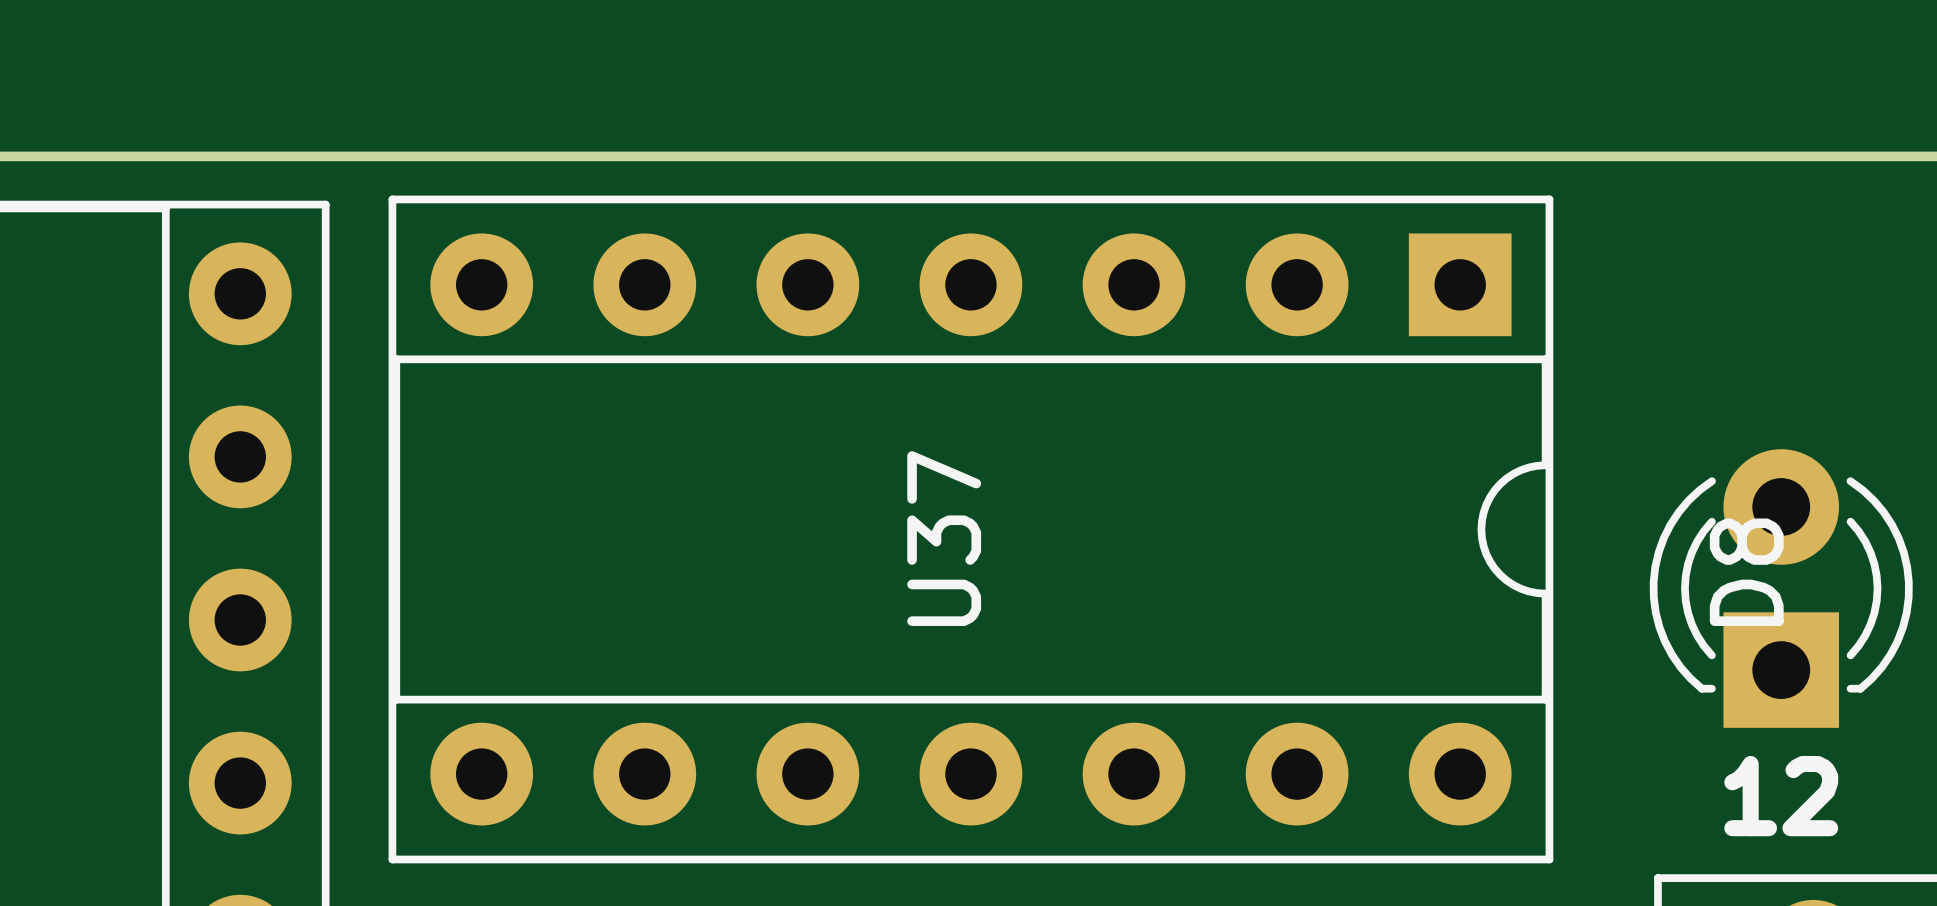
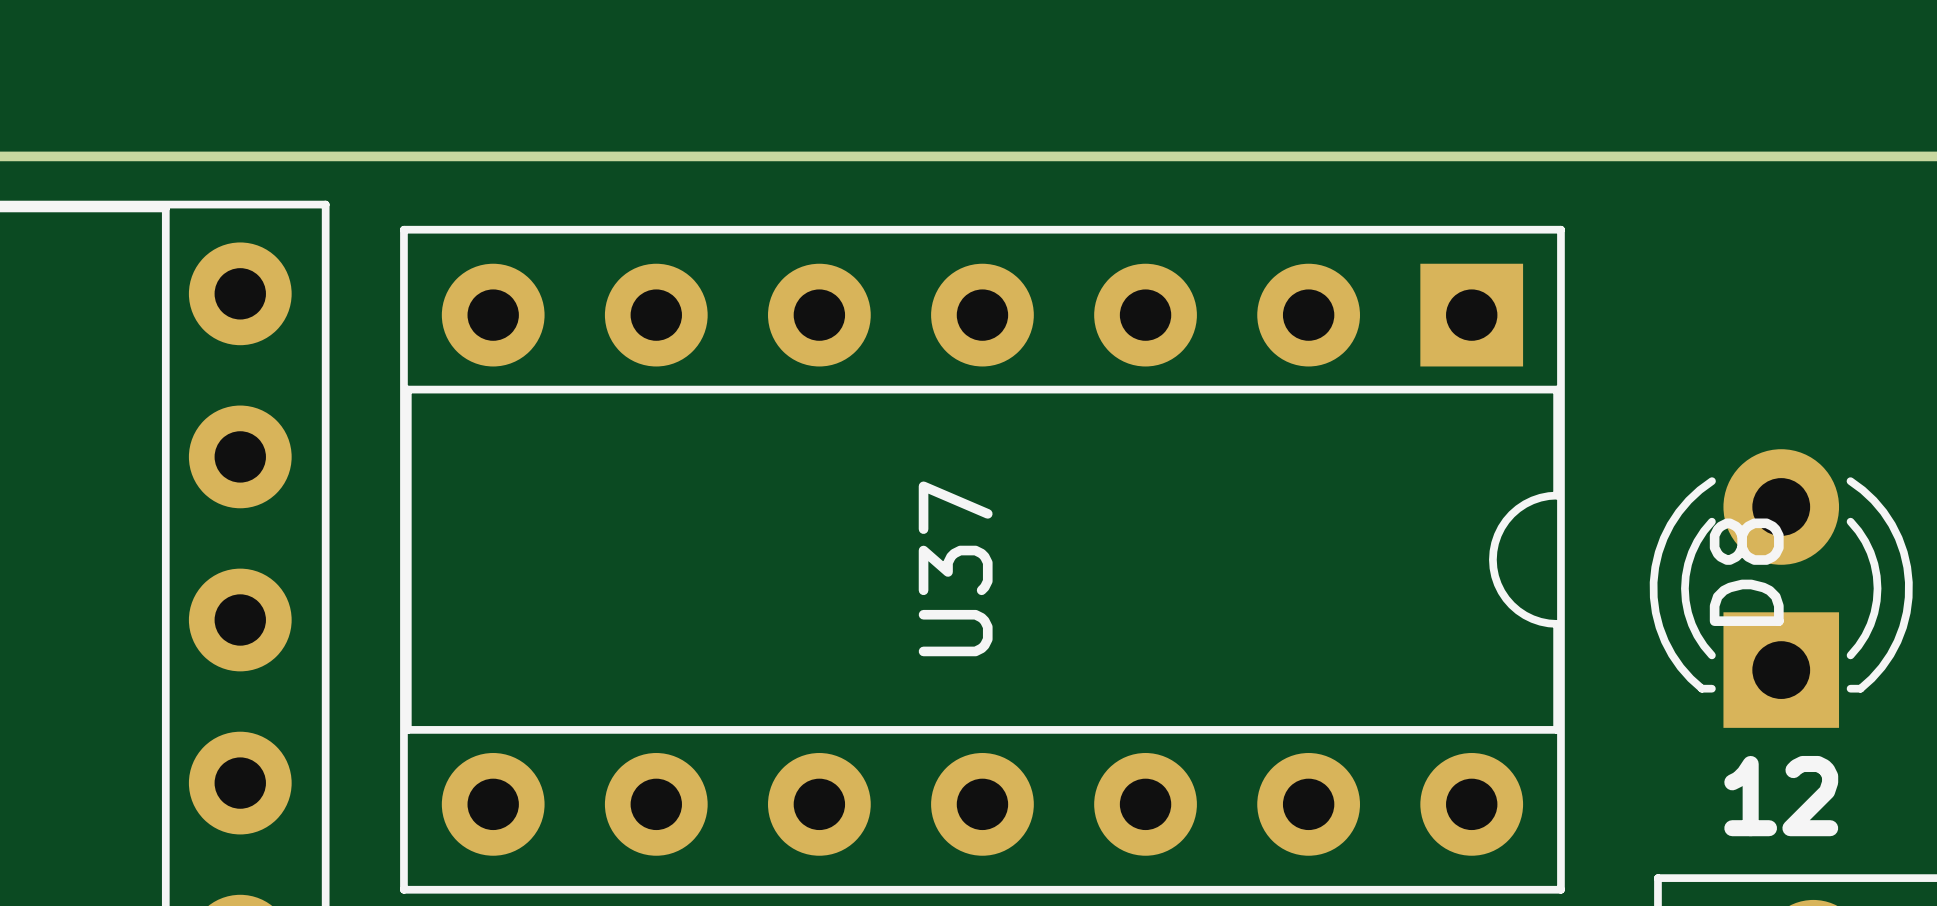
U37 position: (970, 529) -> (982, 559)

